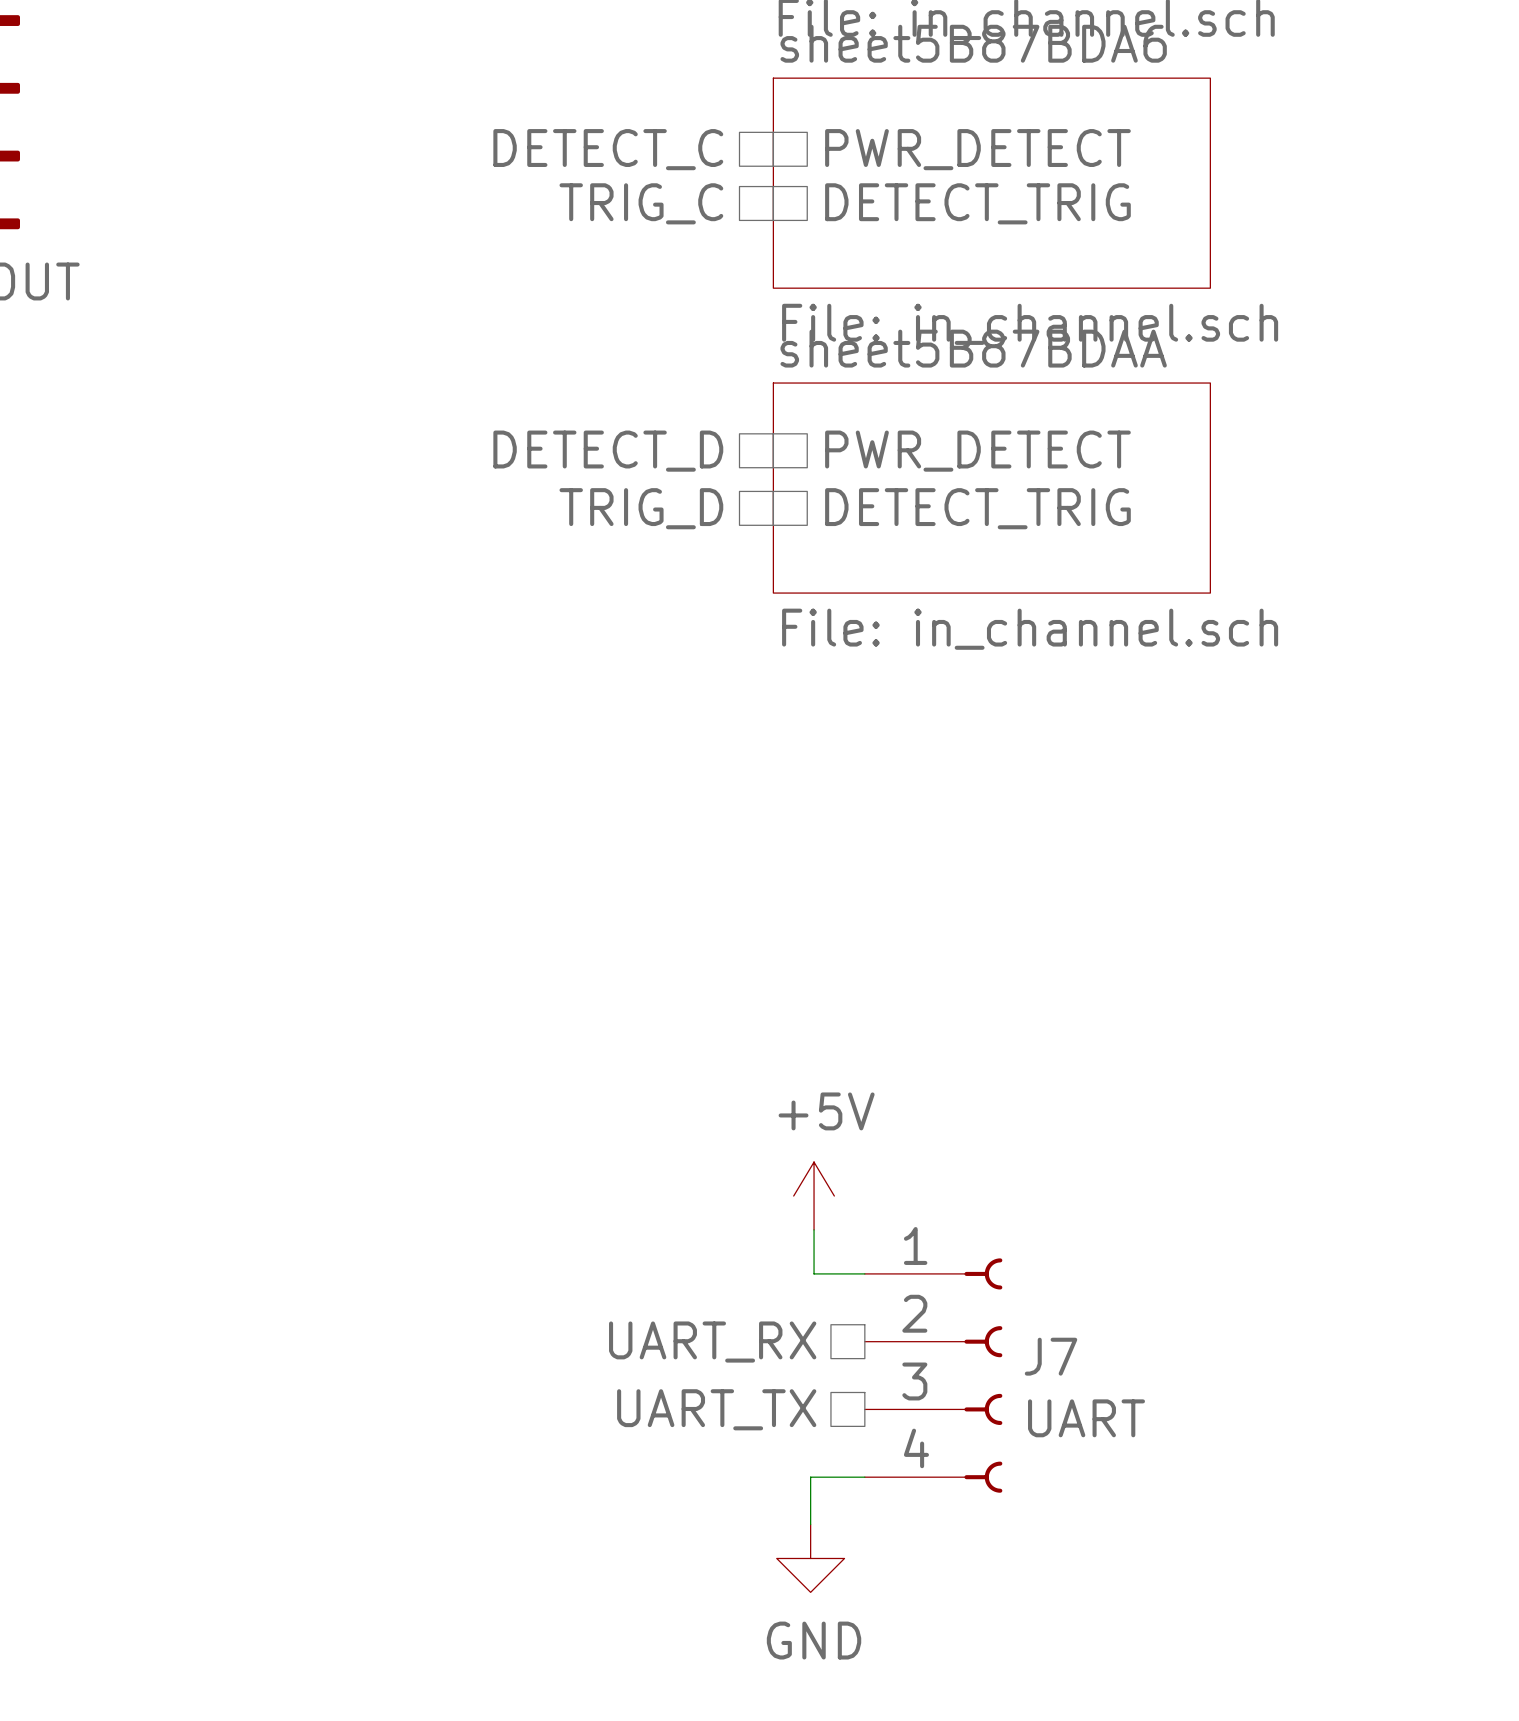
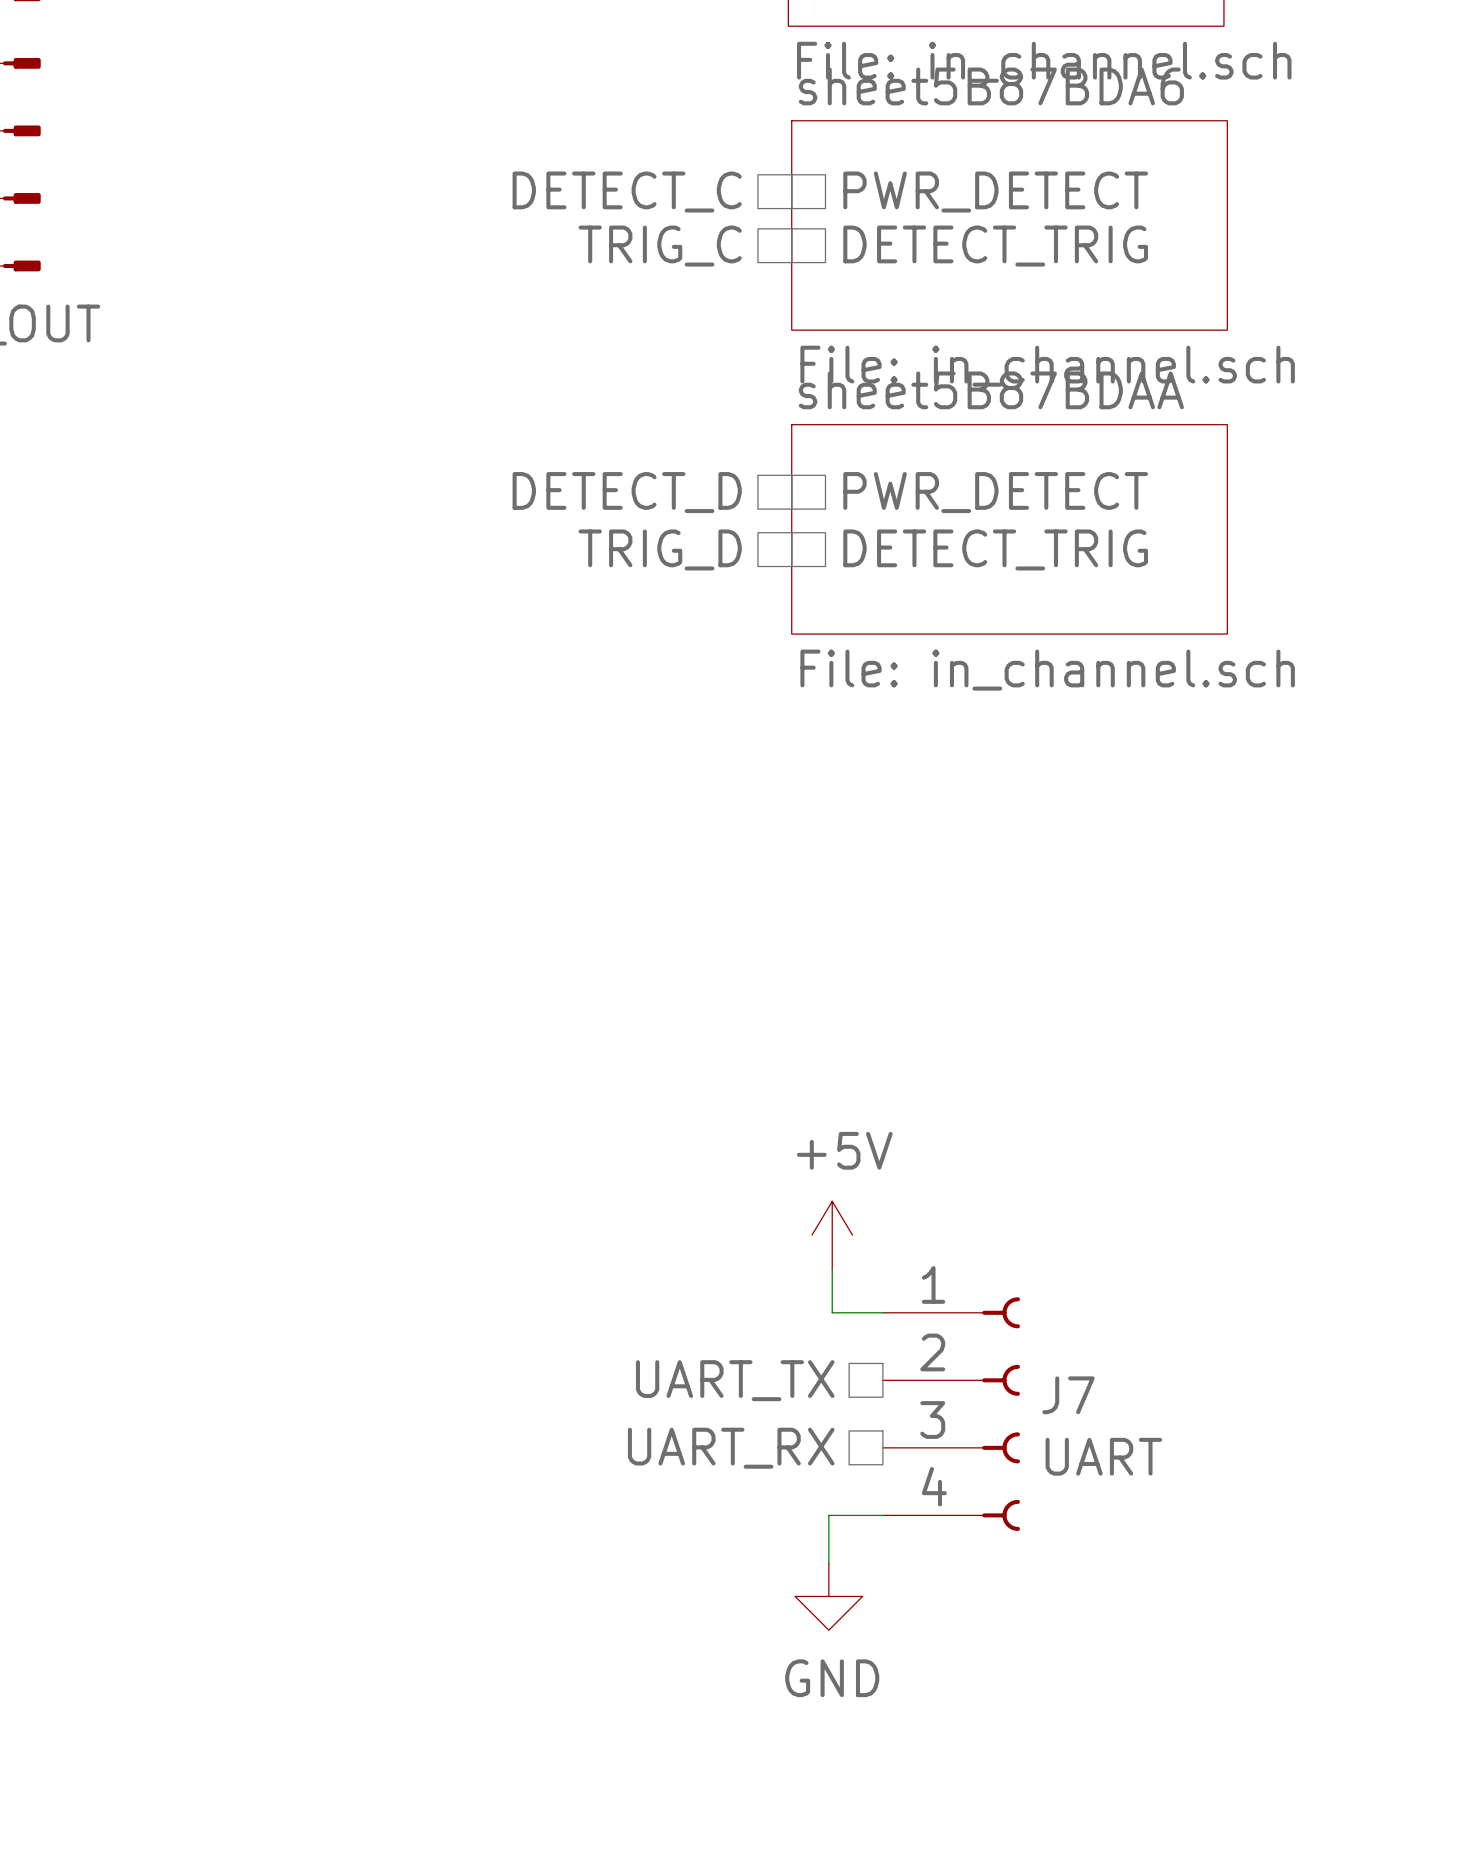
hierarchical label: UART_RX (712, 1342) -> UART_TX (735, 1380)
hierarchical label: UART_TX (716, 1409) -> UART_RX (731, 1448)

